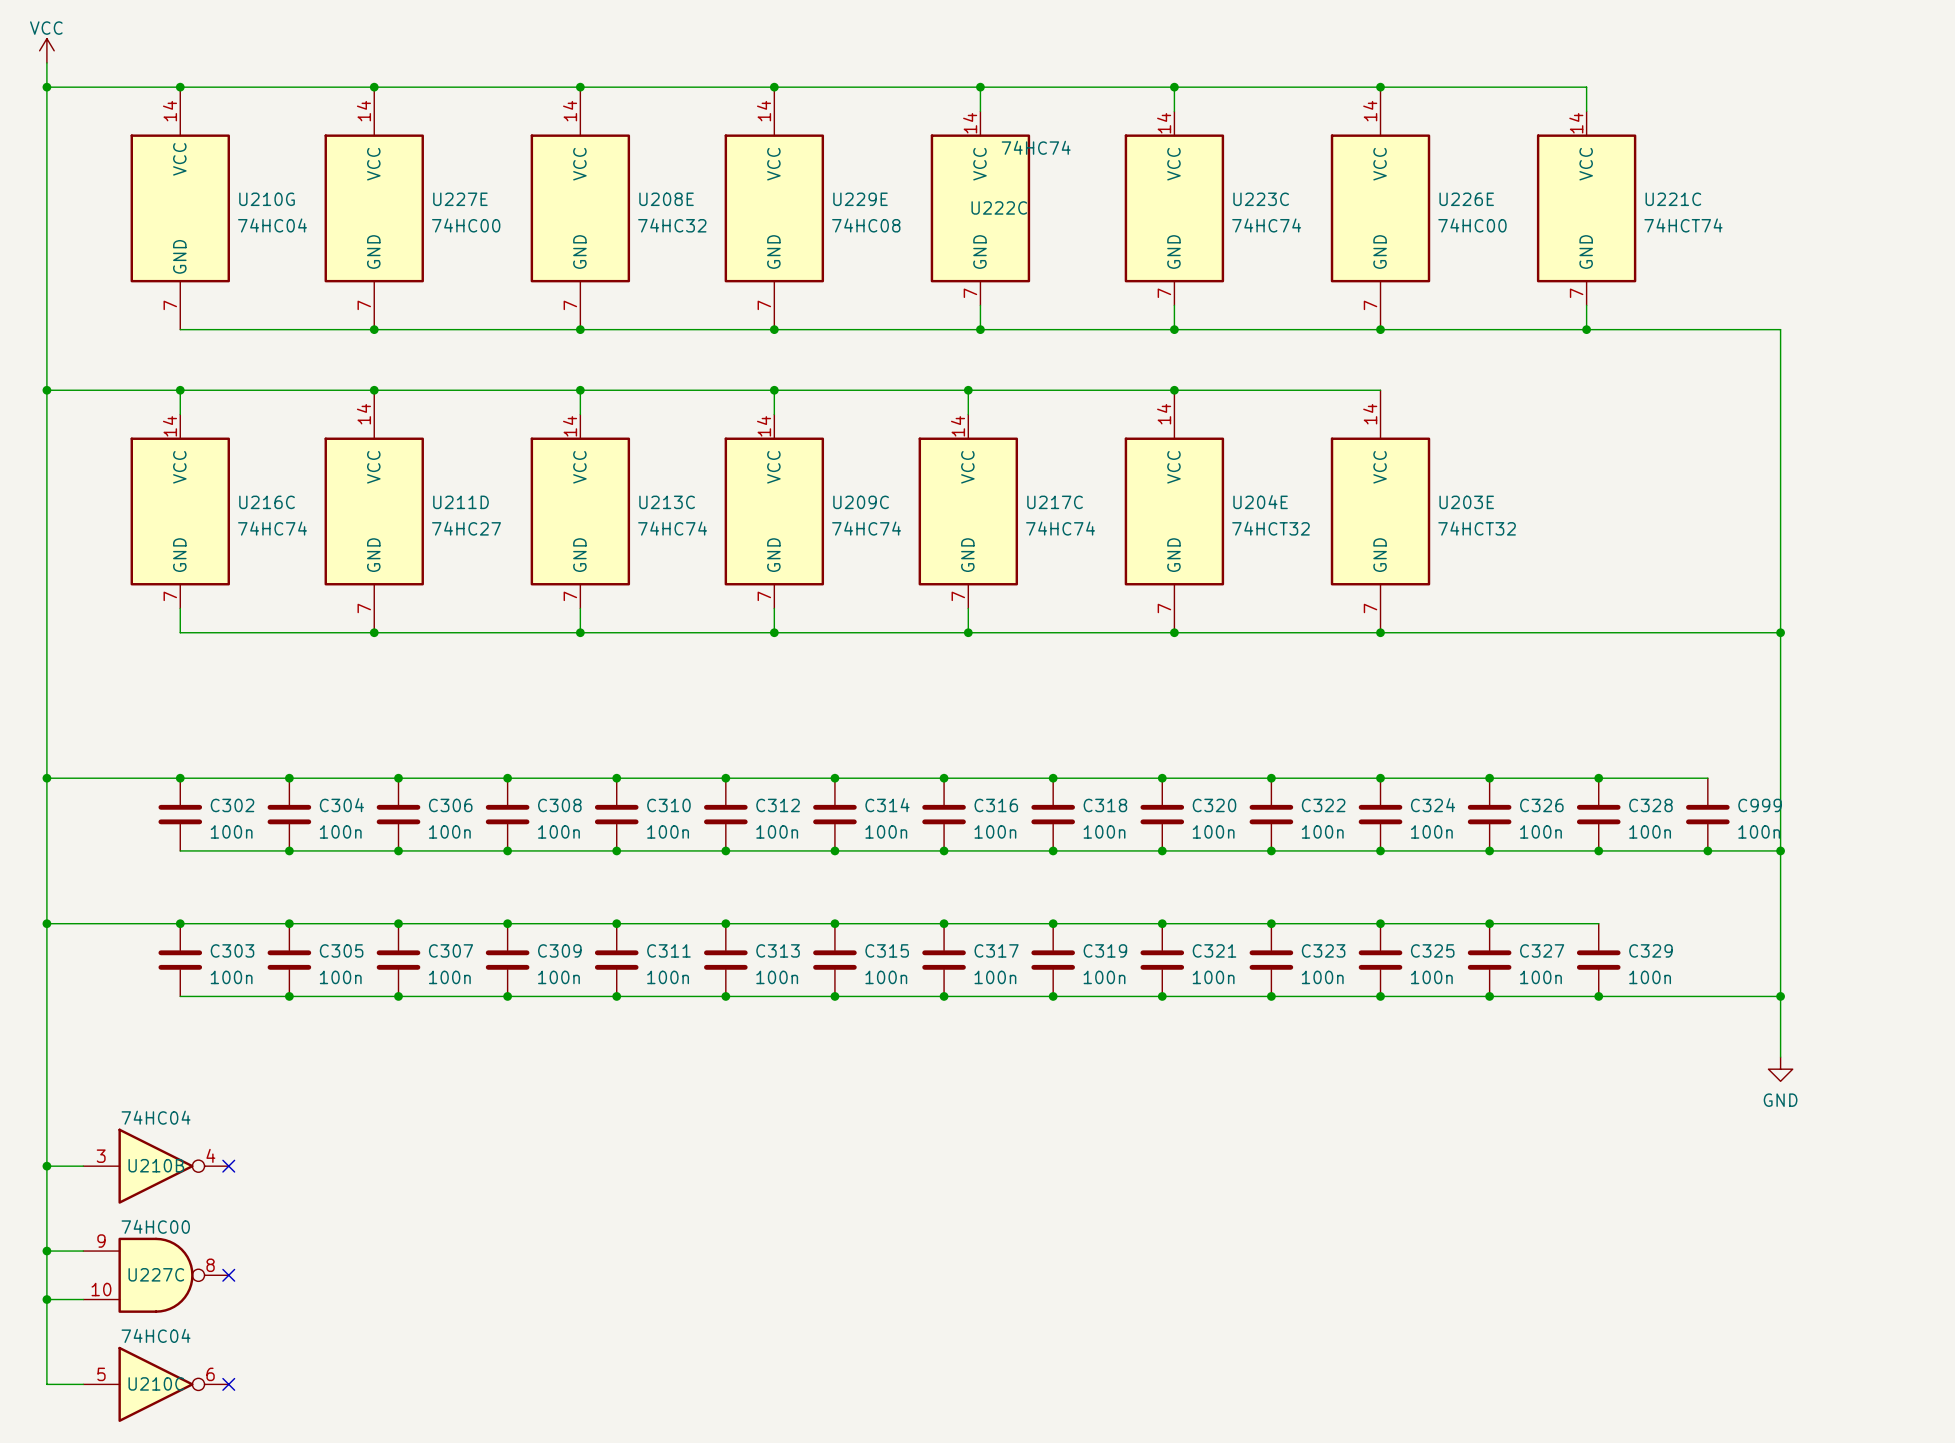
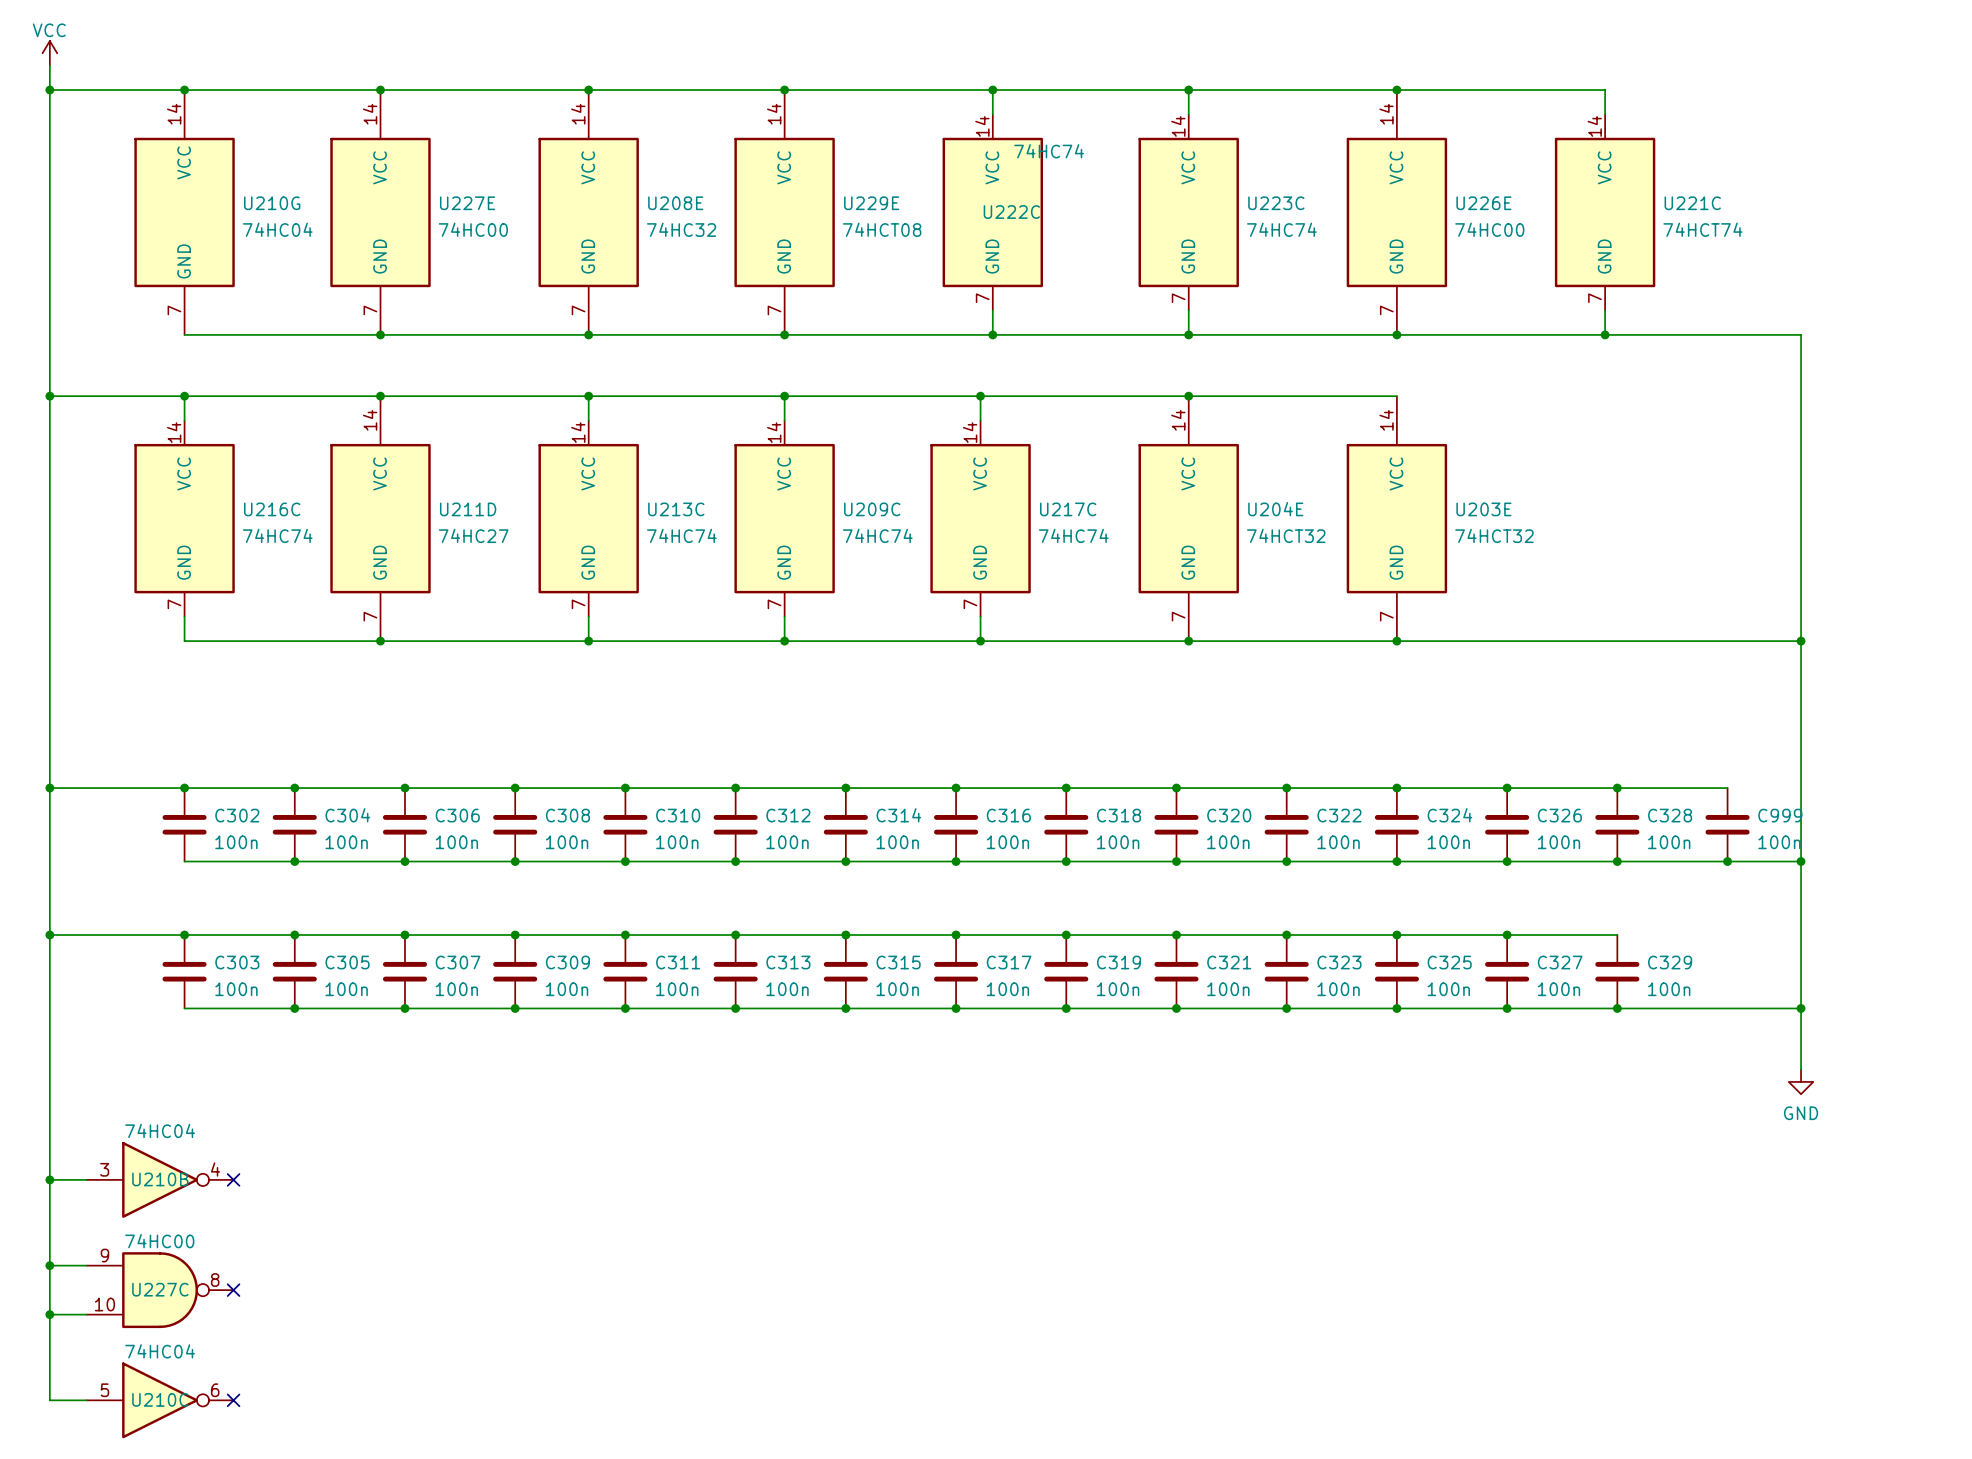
U229E value: 74HC08 (866, 225) -> 74HCT08 (882, 229)

